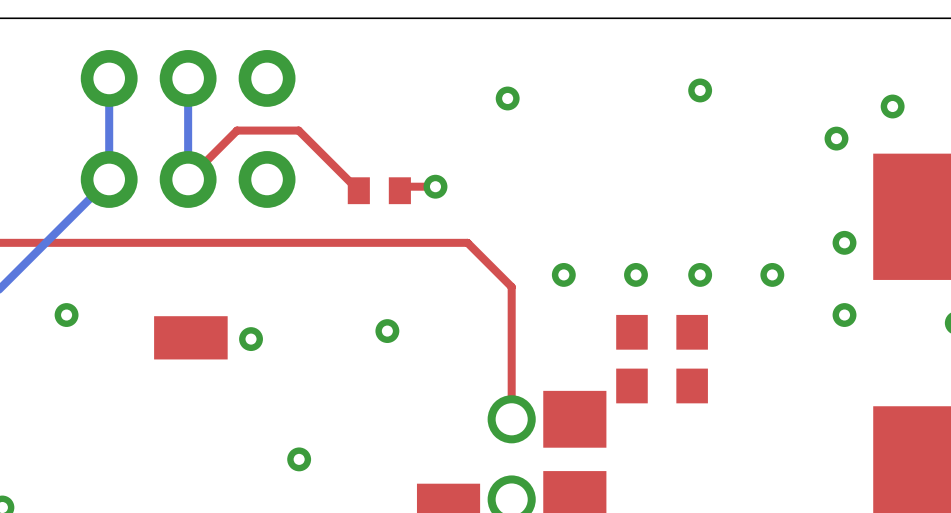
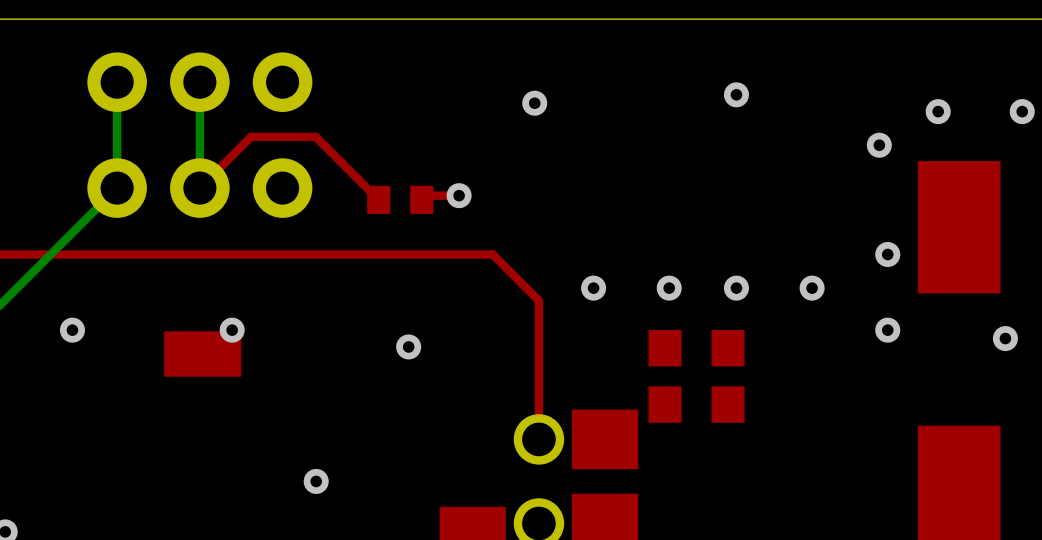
via position: (251, 339) -> (232, 330)

